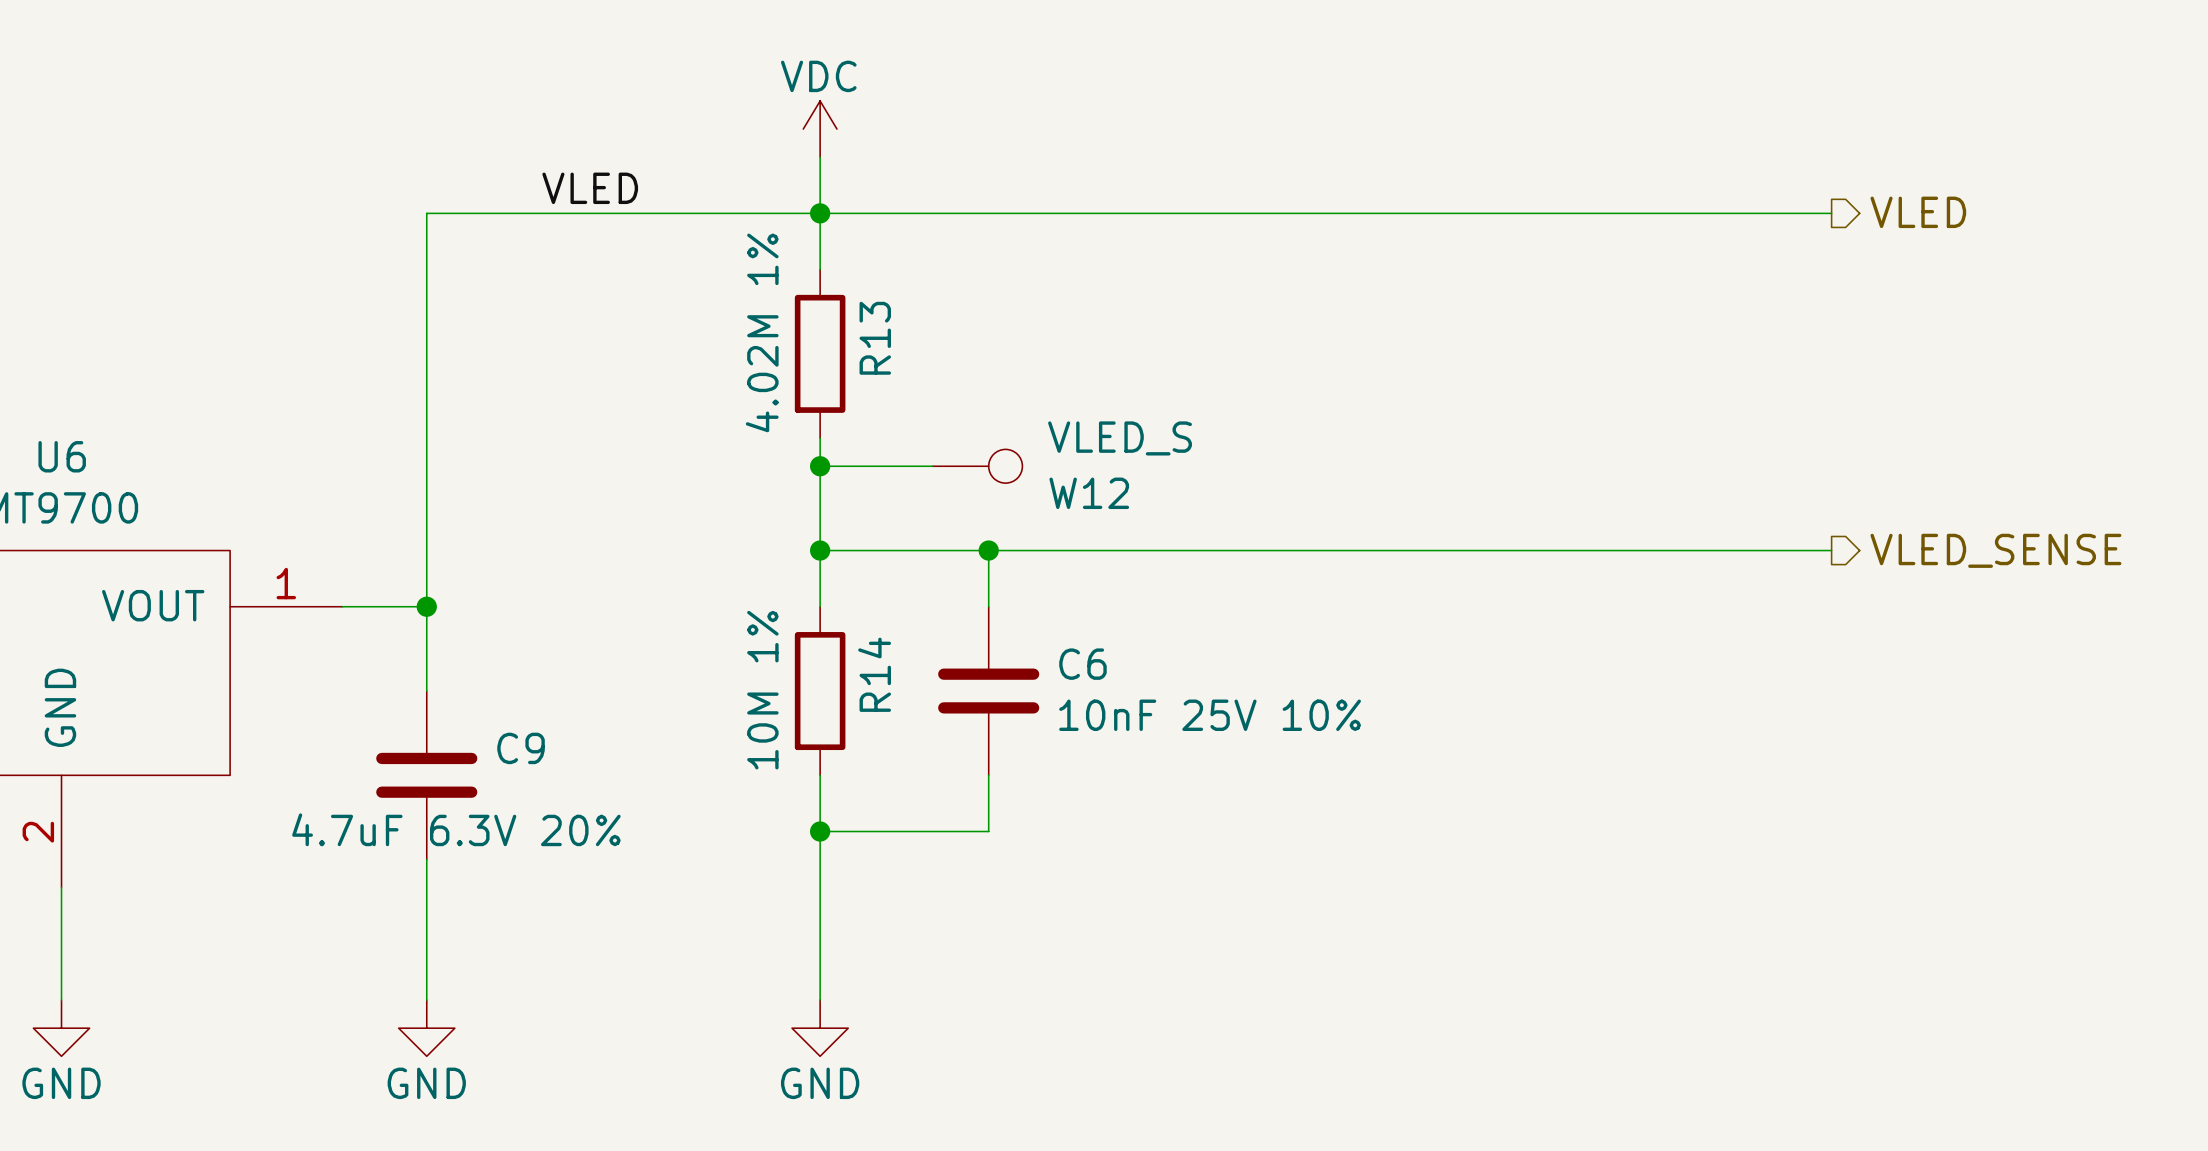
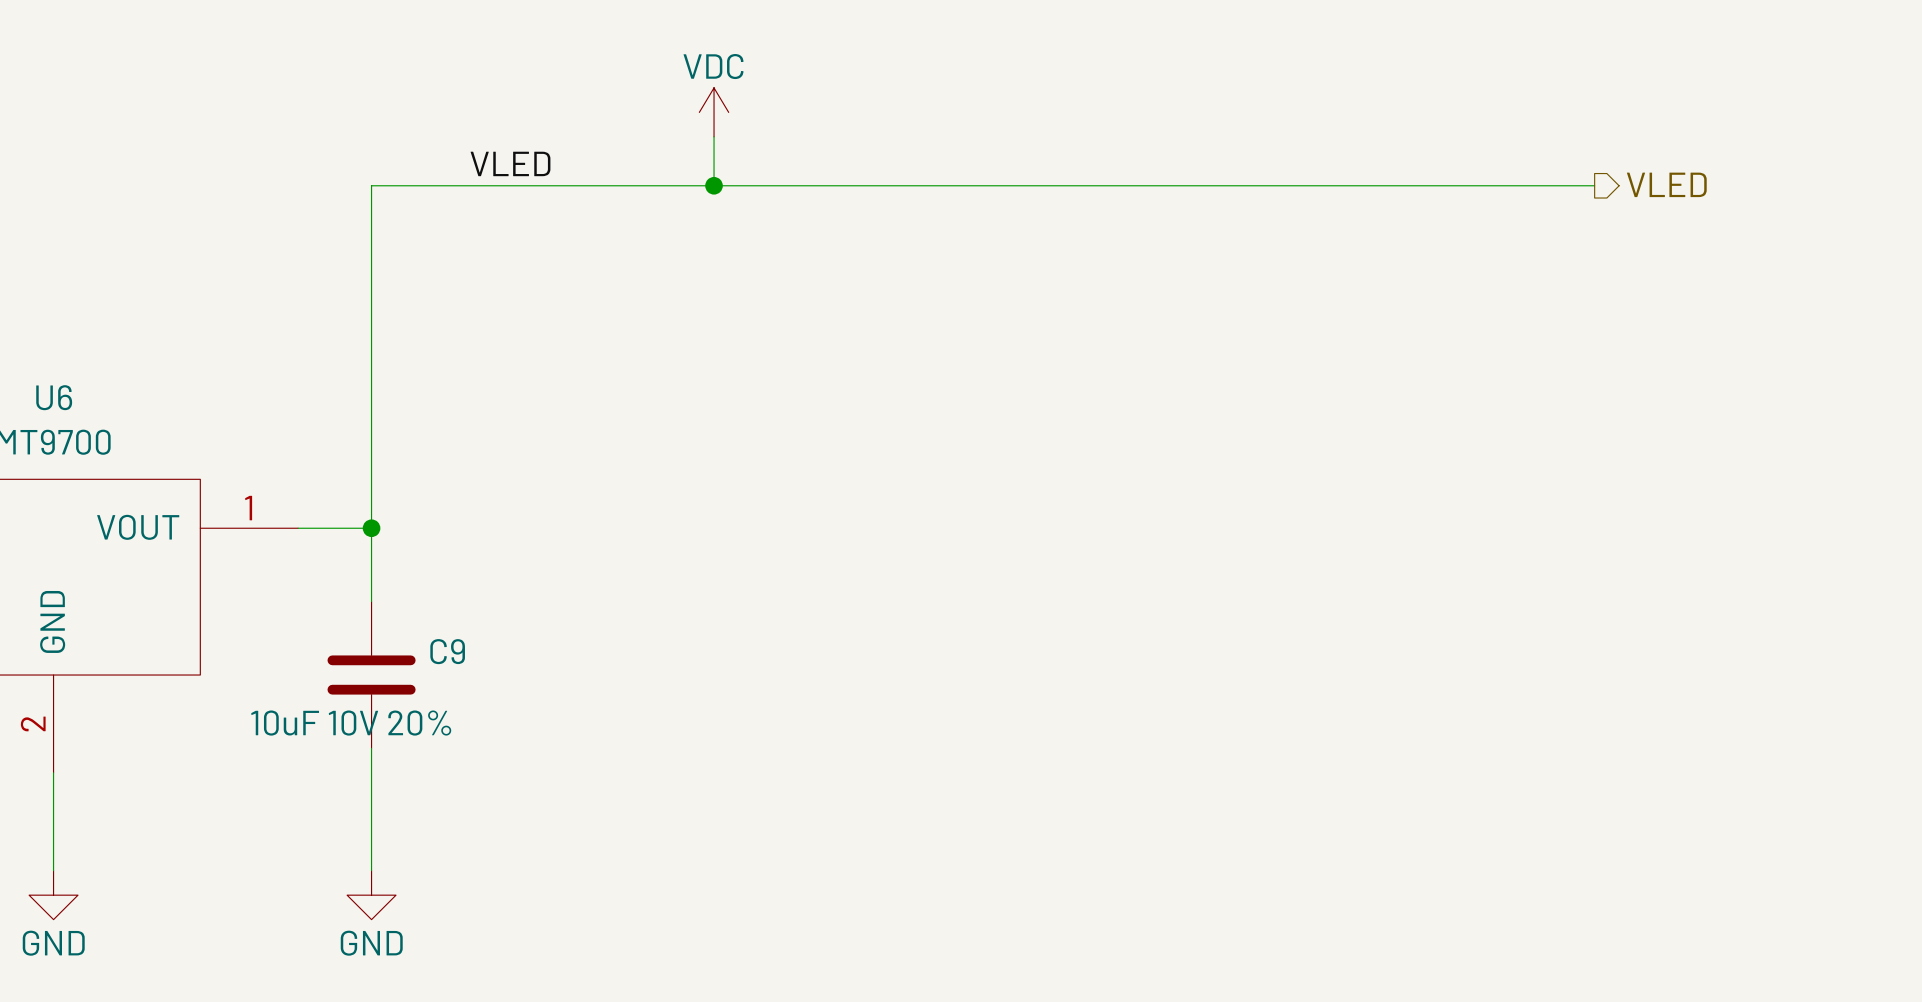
wire: (820, 213) (820, 269) -> none
R13: 4.02M 1% (820, 353) -> none
wire: (820, 438) (820, 606) -> none
wire: (820, 466) (932, 466) -> none
junction: (820, 466) -> none
W12: VLED_S (977, 466) -> none
wire: (820, 550) (1831, 550) -> none
junction: (820, 550) -> none
wire: (988, 550) (988, 606) -> none
junction: (988, 550) -> none
hierarchical label: VLED_SENSE (1995, 550) -> none
R14: 10M 1% (820, 691) -> none
C6: 10nF 25V 10% (988, 691) -> none
wire: (820, 775) (820, 1000) -> none
wire: (988, 775) (988, 831) (820, 831) -> none
C9 value: 4.7uF 6.3V 20% (456, 829) -> 10uF 10V 20% (351, 723)
junction: (820, 831) -> none
power symbol: GND (820, 1028) -> none

